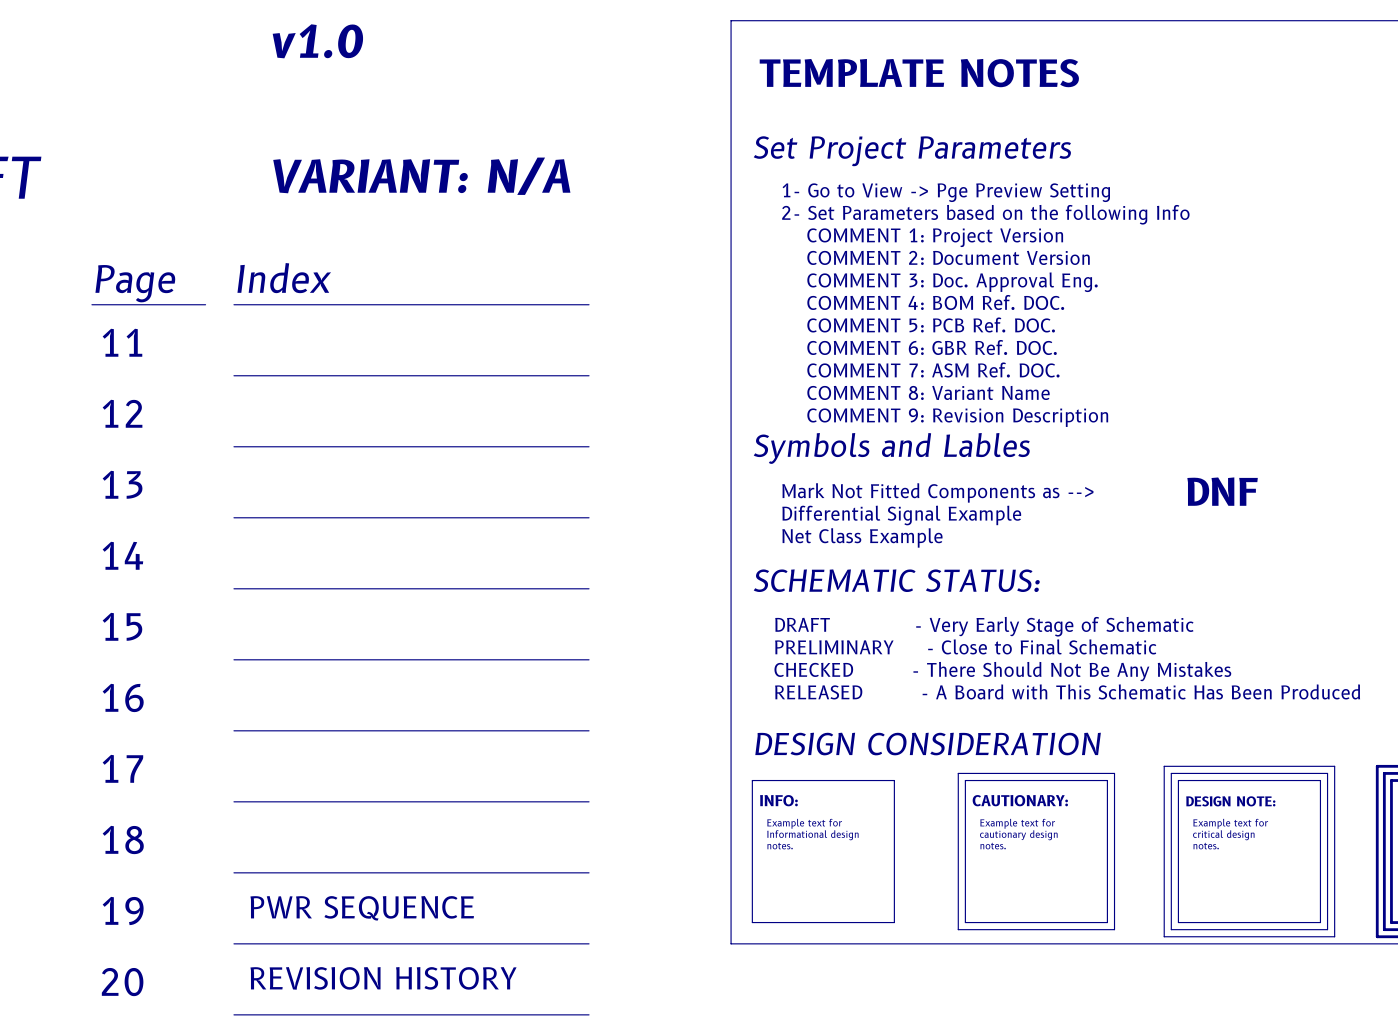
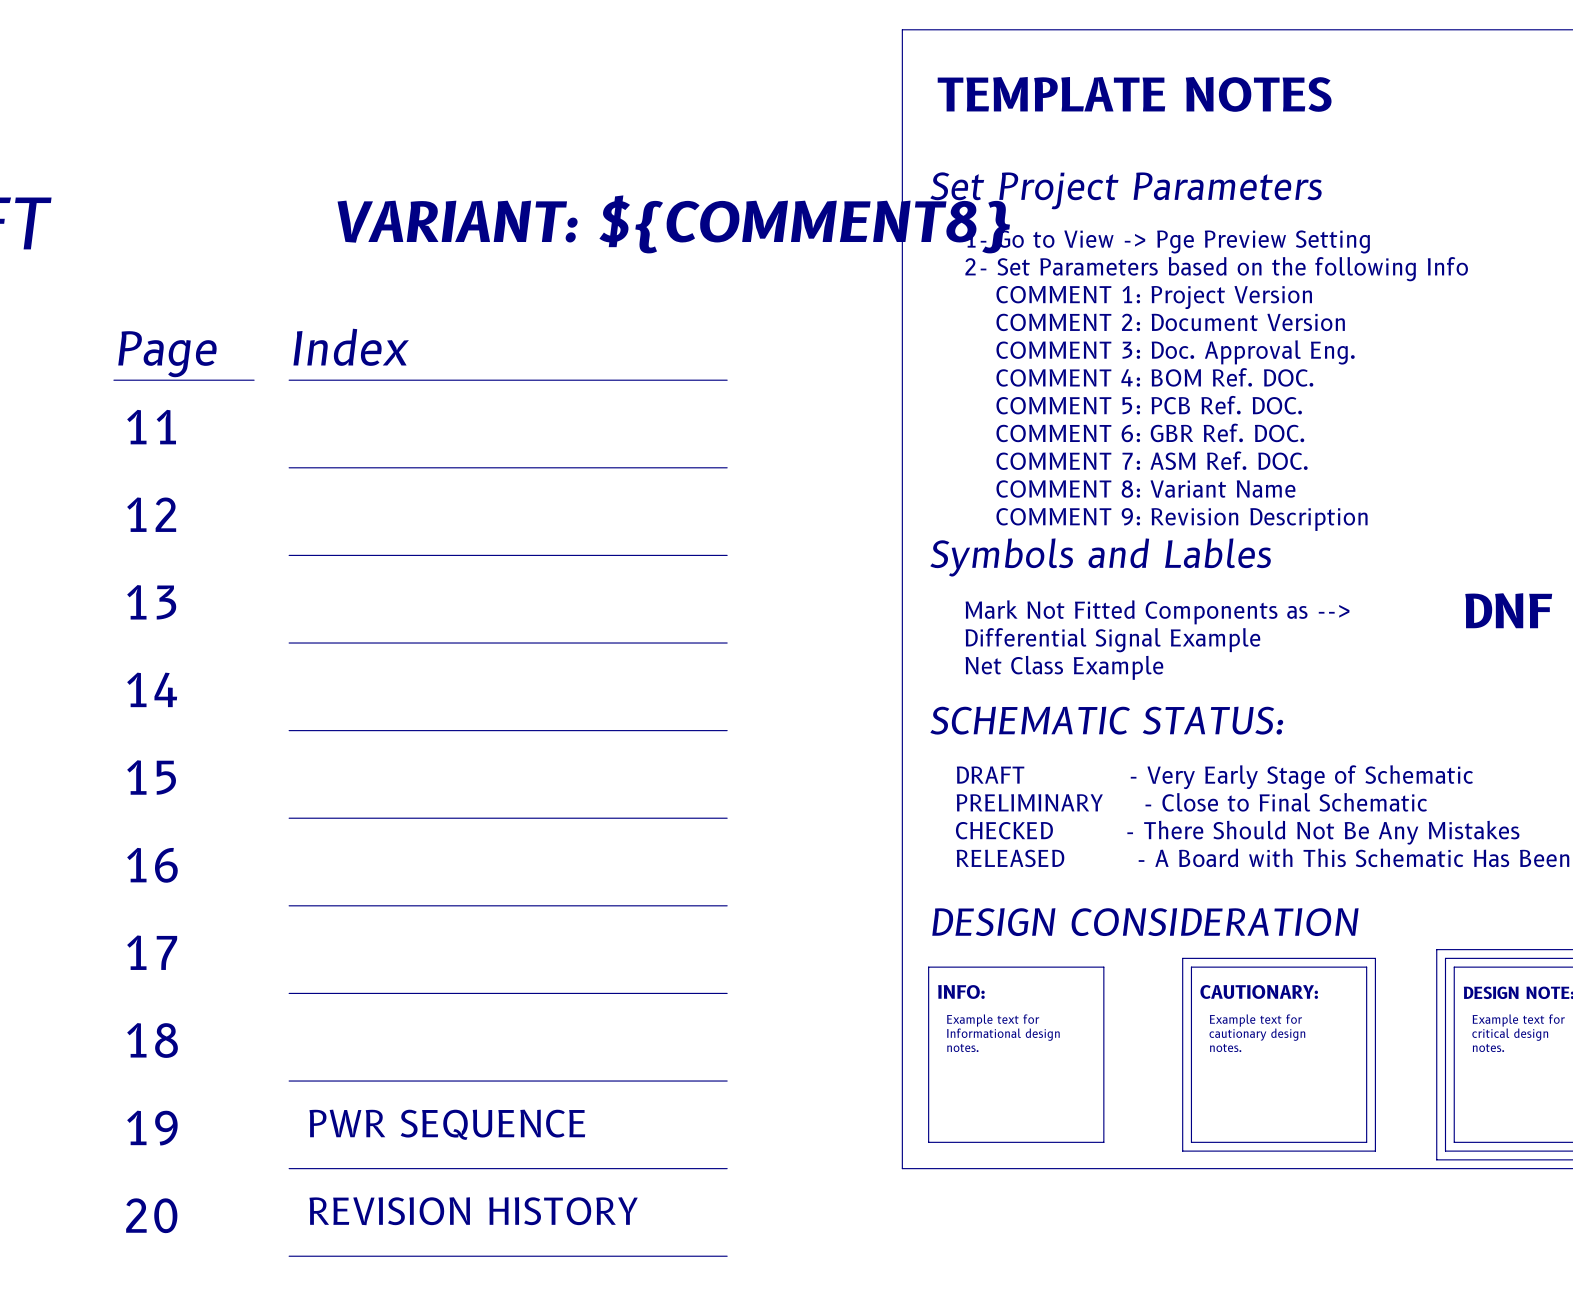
text: v1.0 (317, 41) -> none
text: VARIANT: N/A (421, 176) -> VARIANT: ${COMMENT8} (673, 224)

